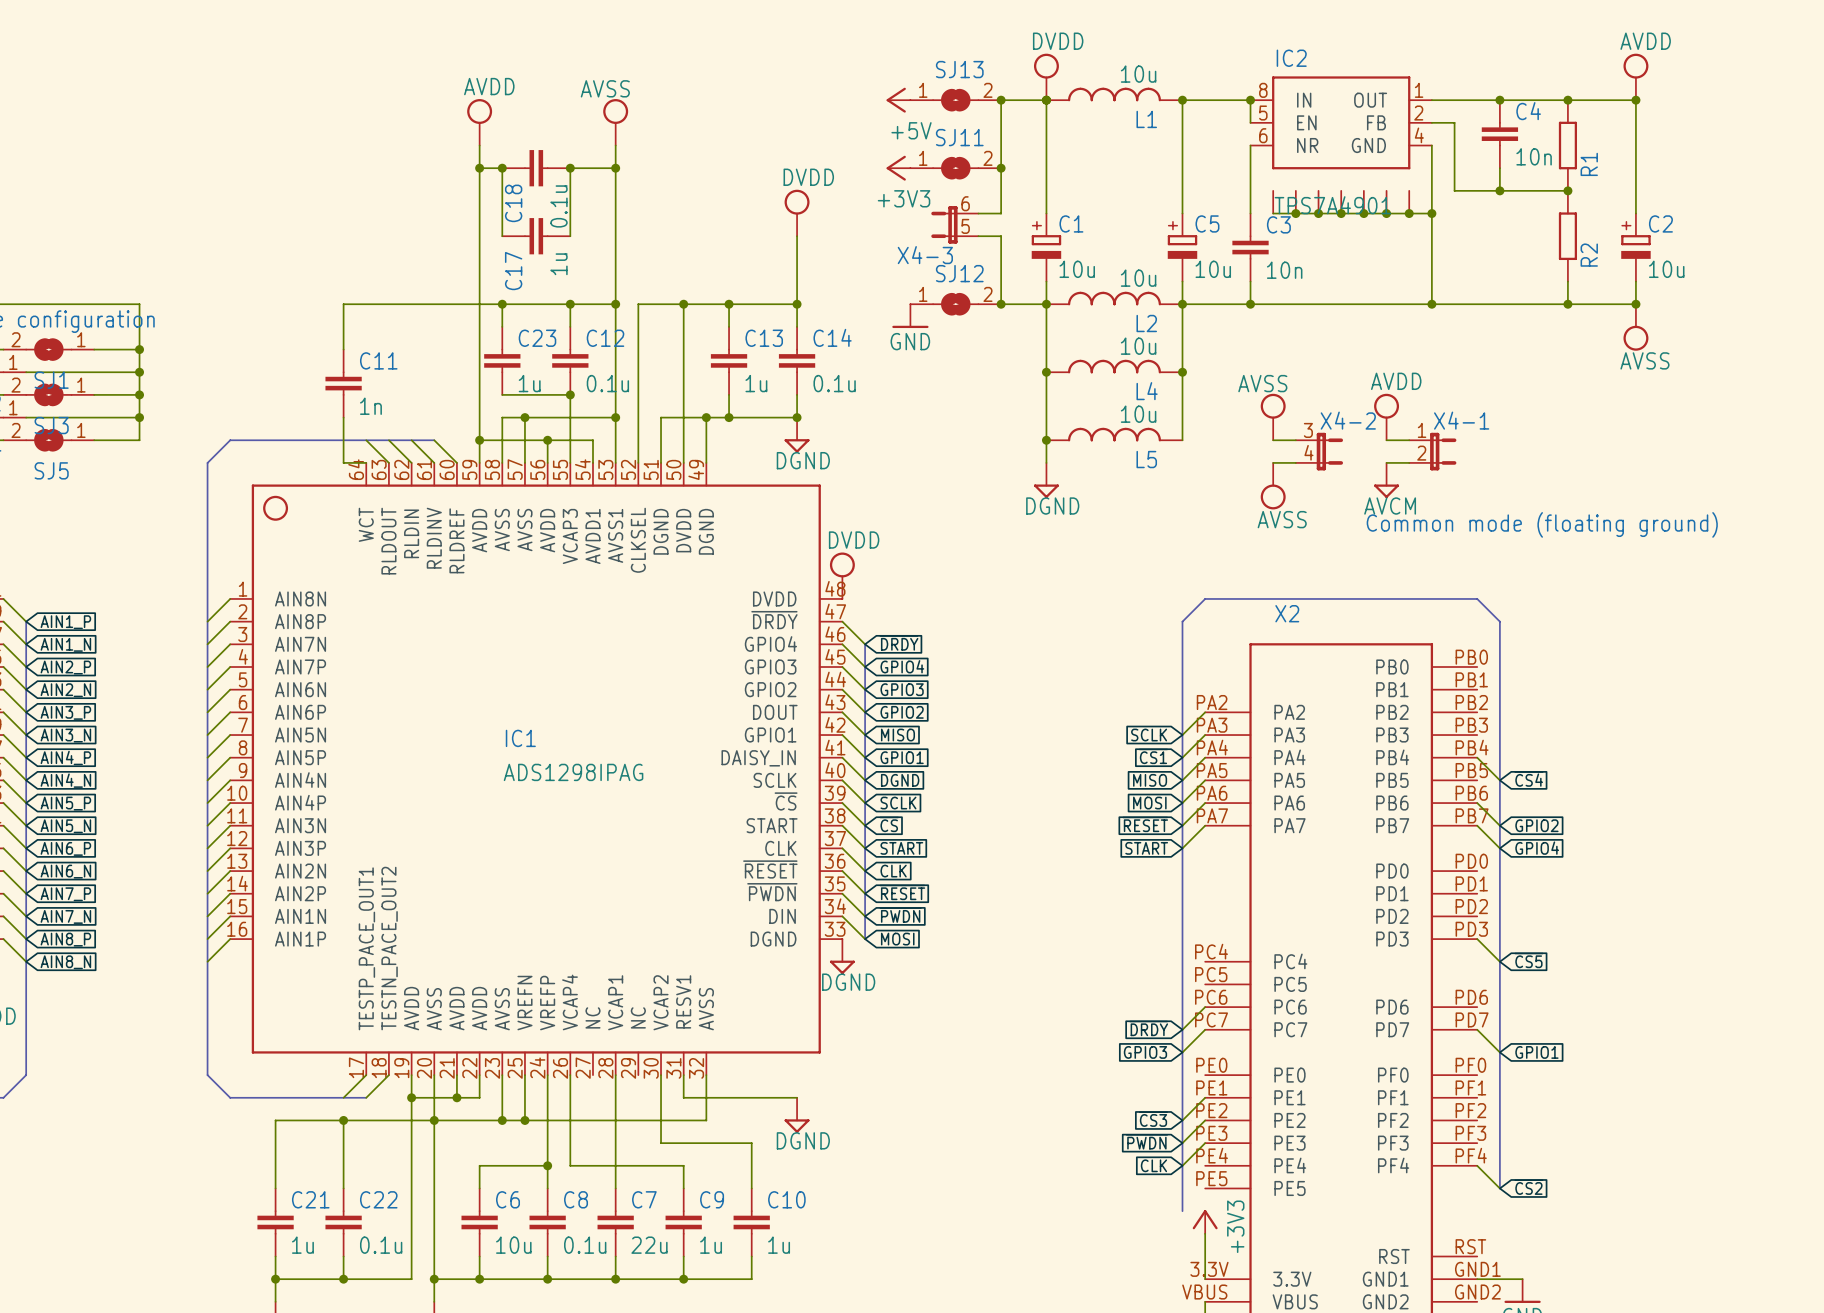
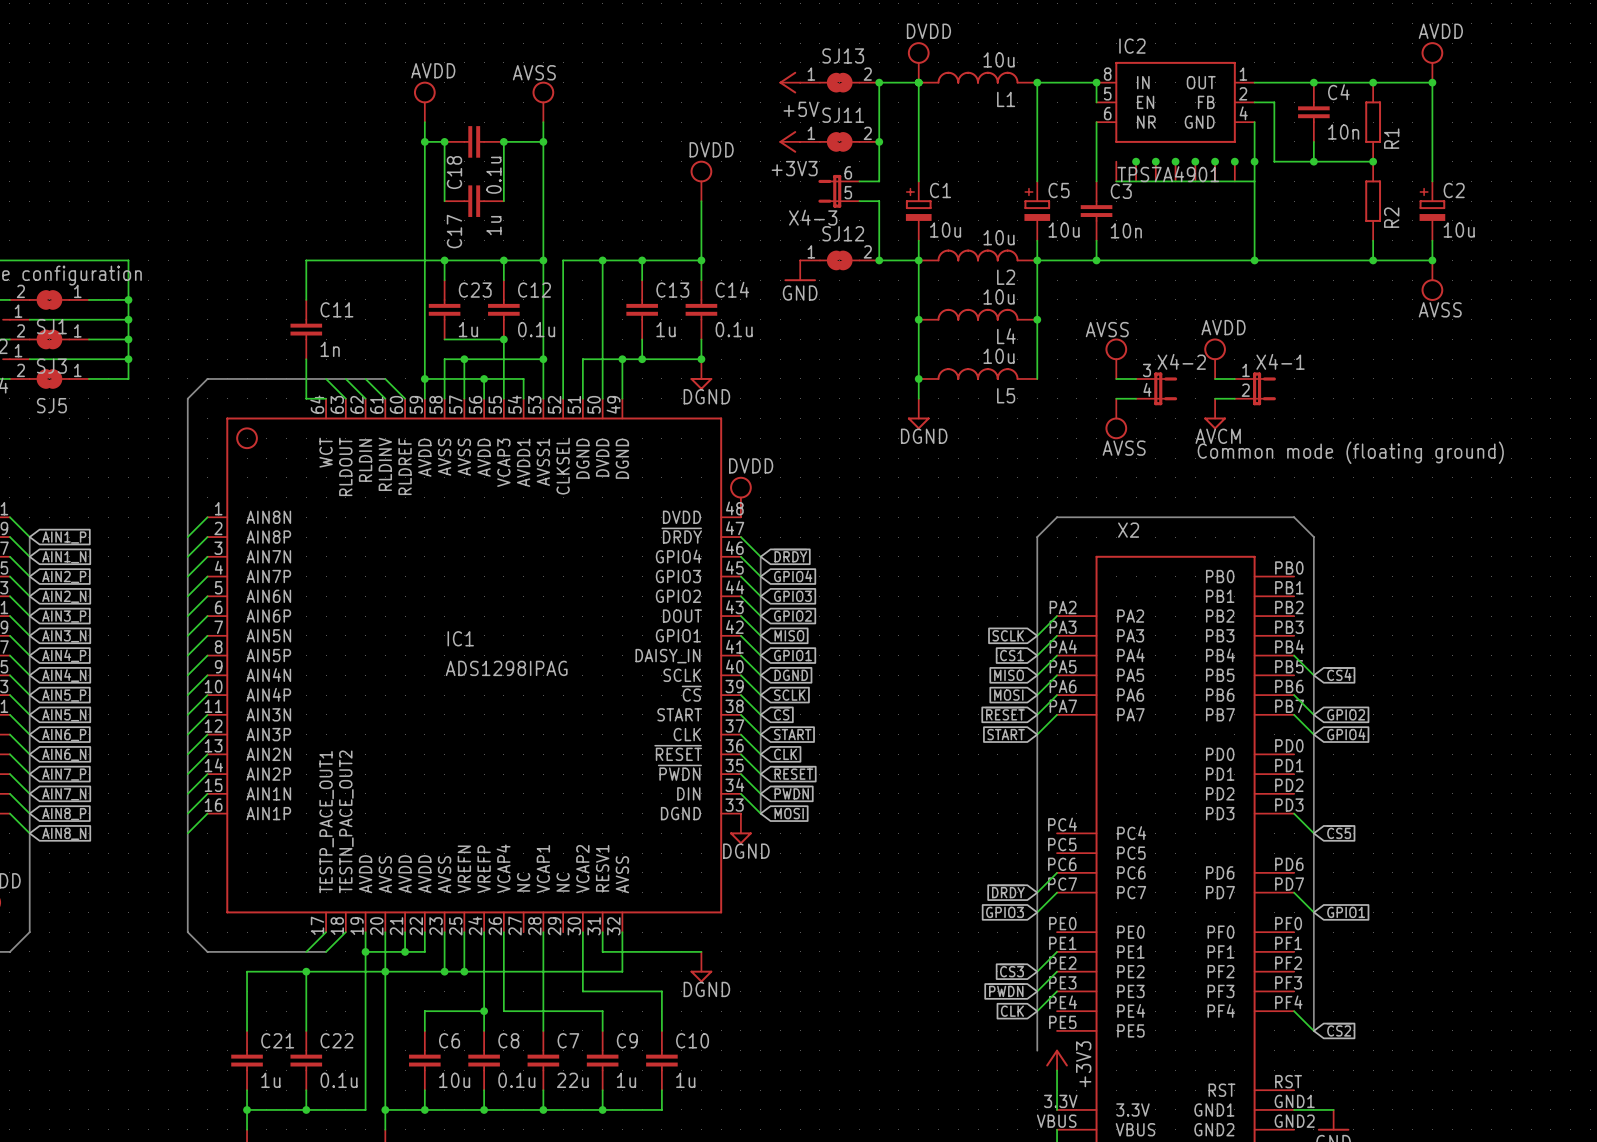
junction: none -> (1136, 161)
junction: none -> (1155, 161)
junction: none -> (1175, 161)
junction: none -> (1195, 161)
junction: none -> (1215, 161)
junction: none -> (1234, 161)
junction: none -> (1254, 161)
junction: (1295, 213) -> none
junction: (1318, 213) -> none
junction: (1341, 213) -> none
junction: (1363, 213) -> none
junction: (1386, 213) -> none
junction: (1409, 213) -> none
junction: (1431, 213) -> none

